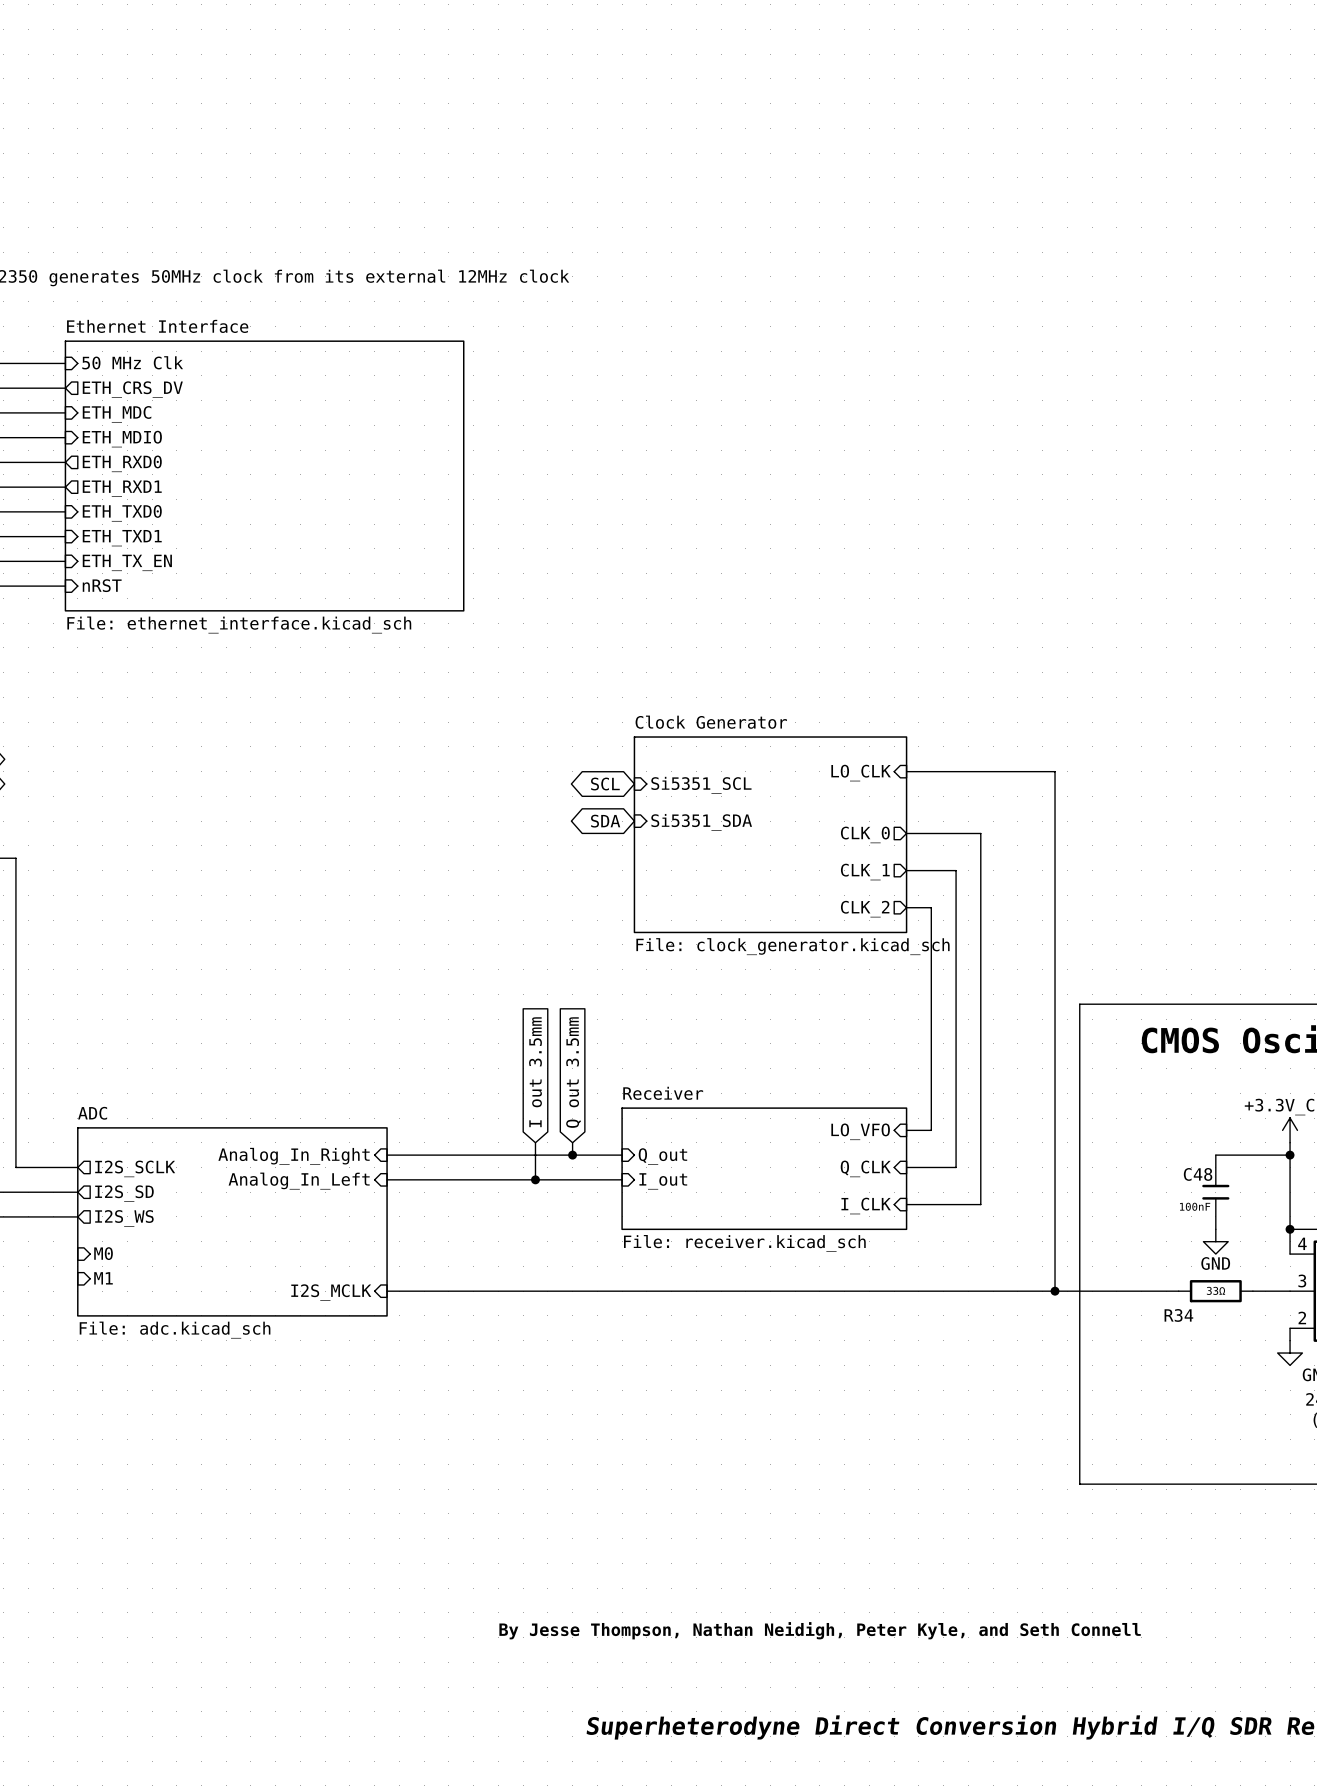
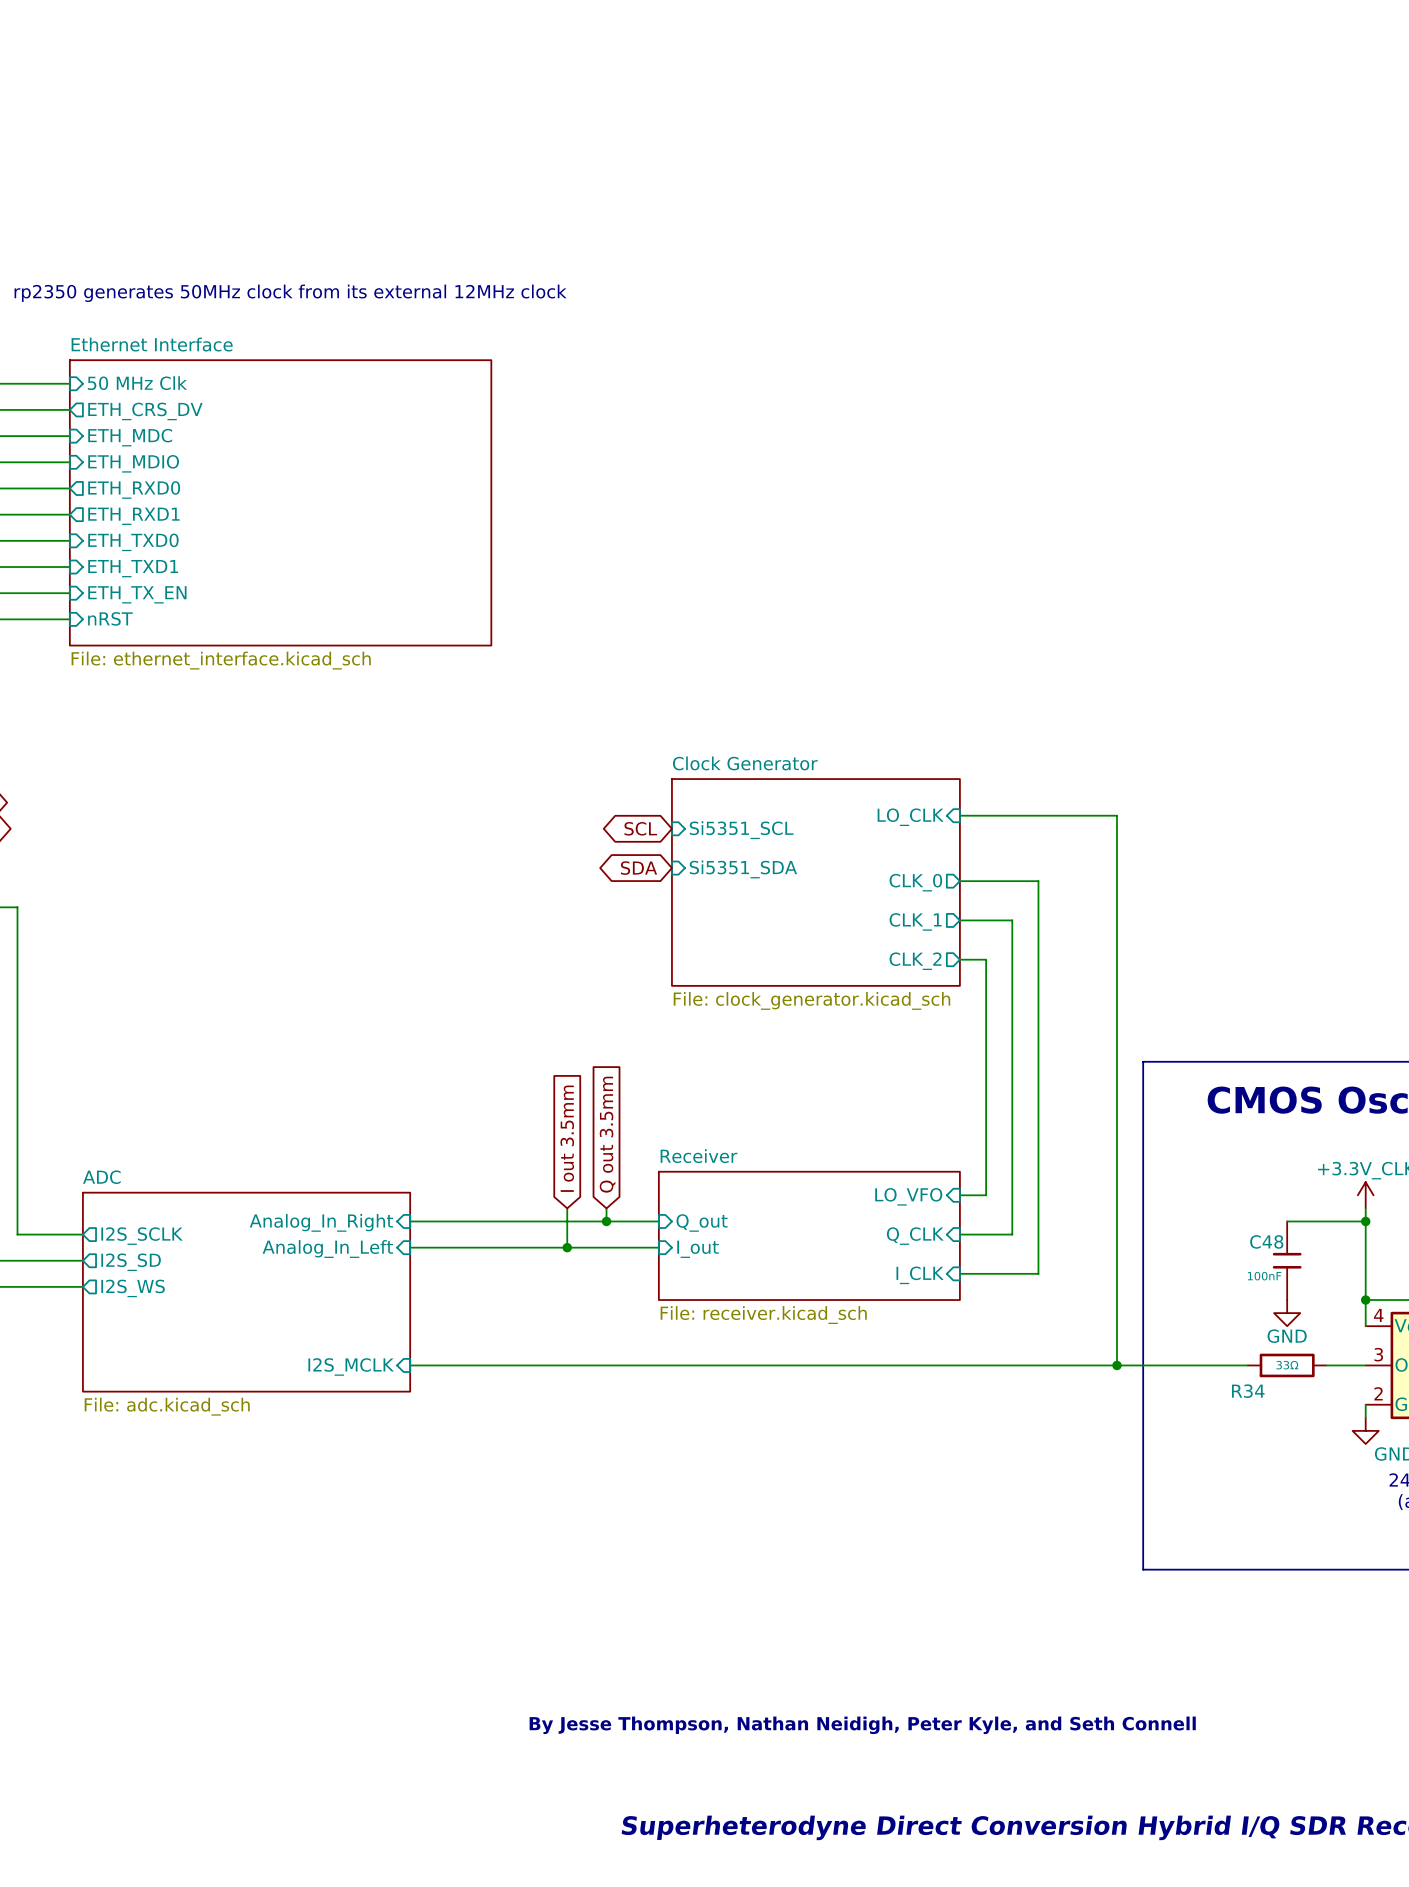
sheet pin: M0 (103, 1253) -> none
sheet pin: M1 (103, 1278) -> none

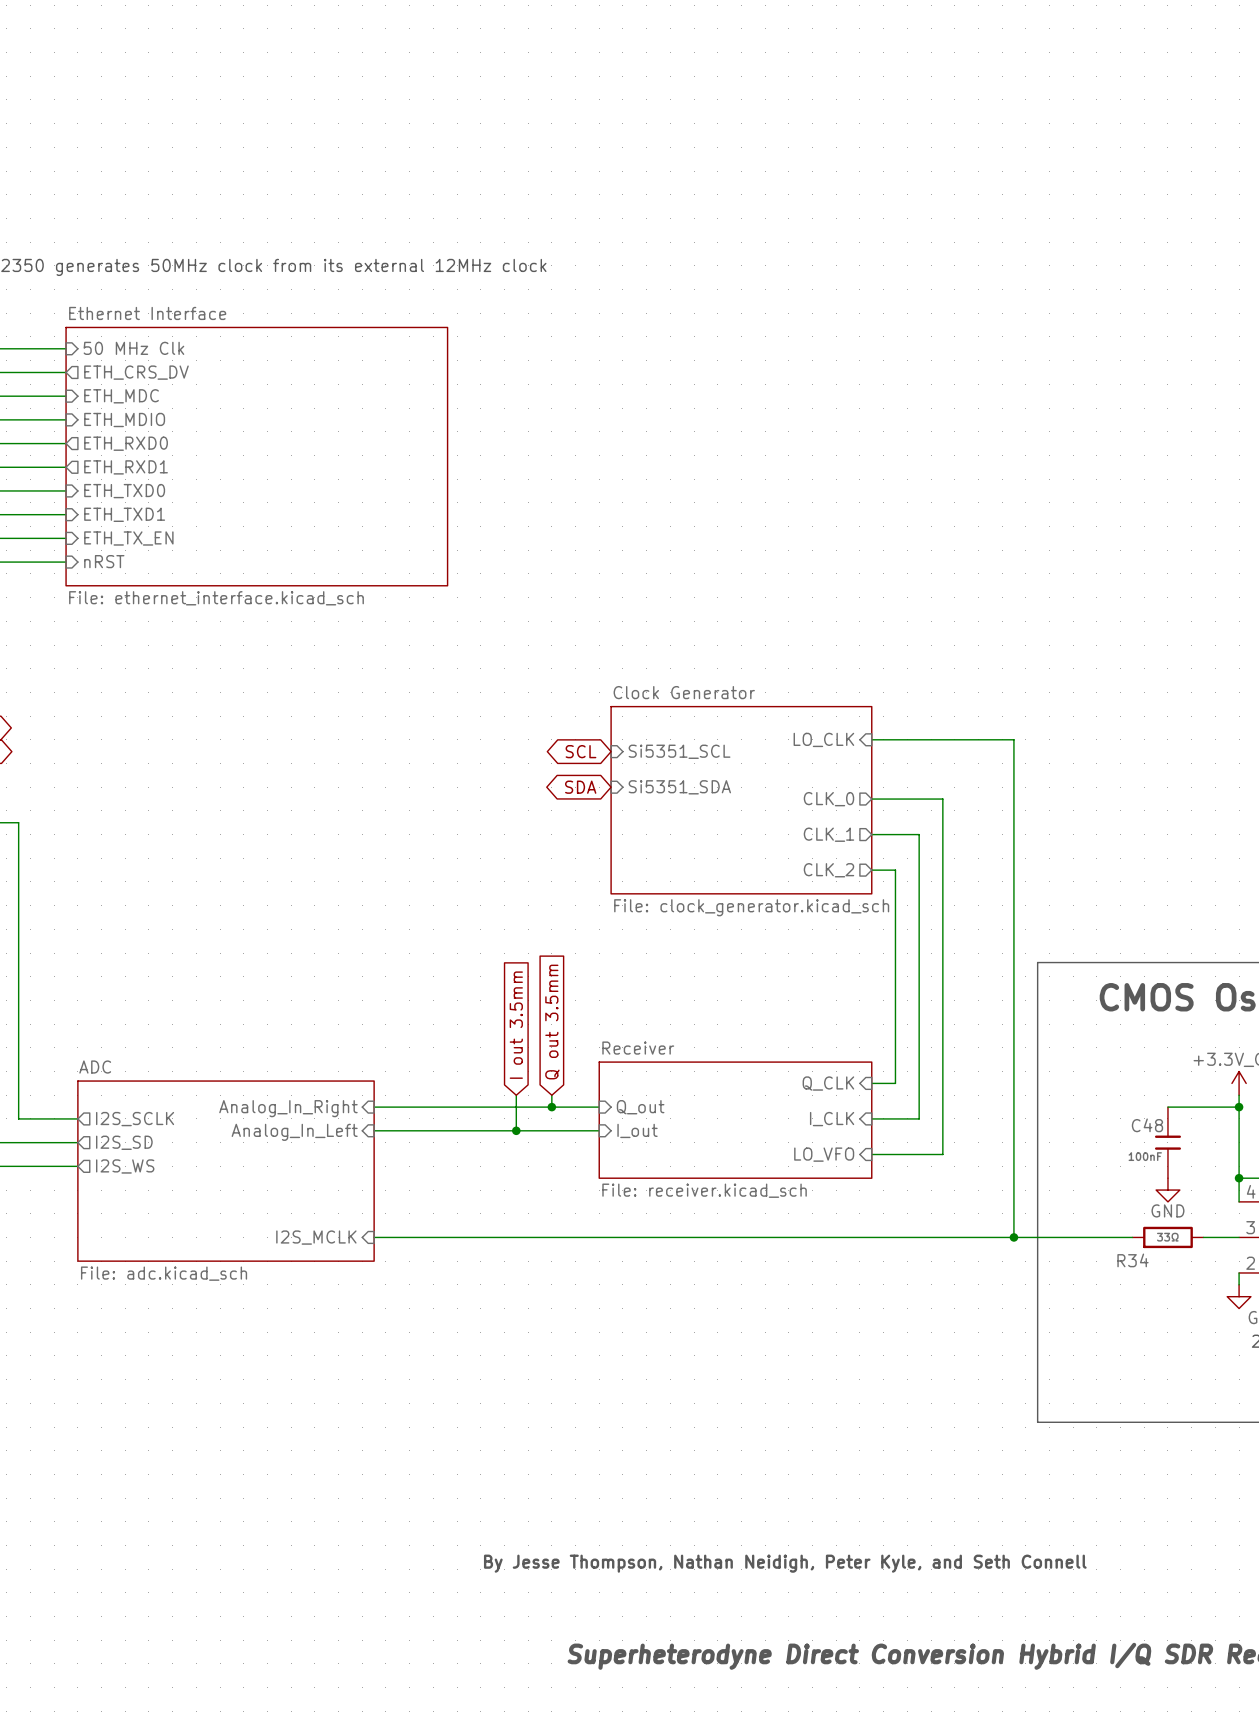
sheet pin: LO_VFO (908, 1196) -> Q_CLK (828, 1083)
sheet pin: Q_CLK (915, 1236) -> I_CLK (832, 1119)
sheet pin: I_CLK (920, 1275) -> LO_VFO (824, 1154)

